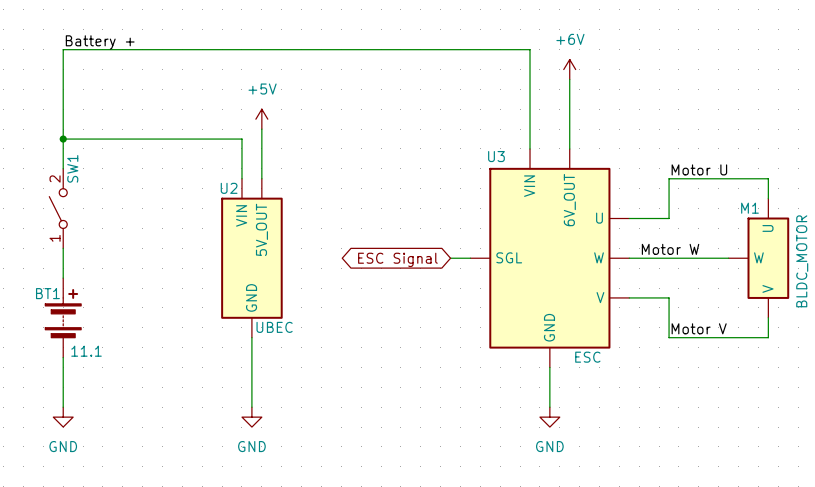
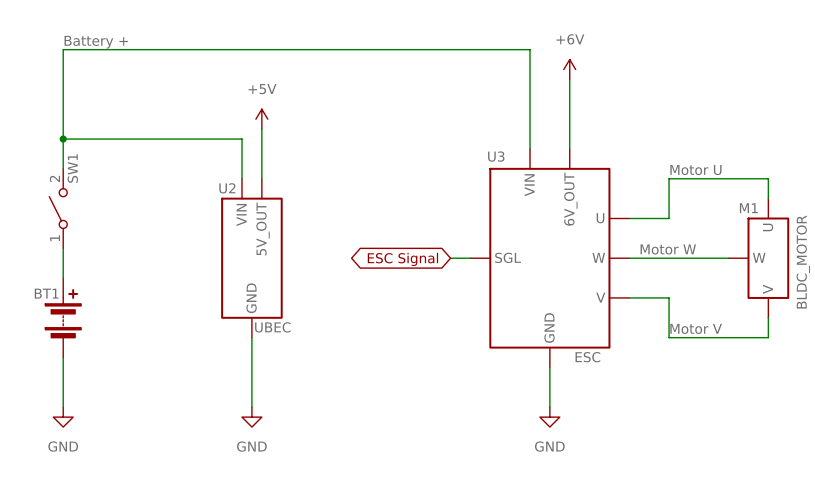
BT1 value: 11.1 (86, 351) -> none

